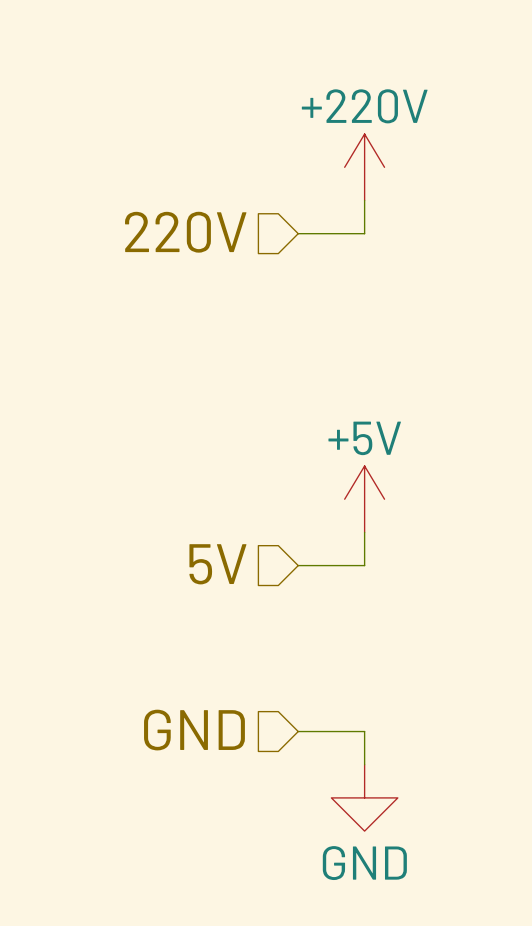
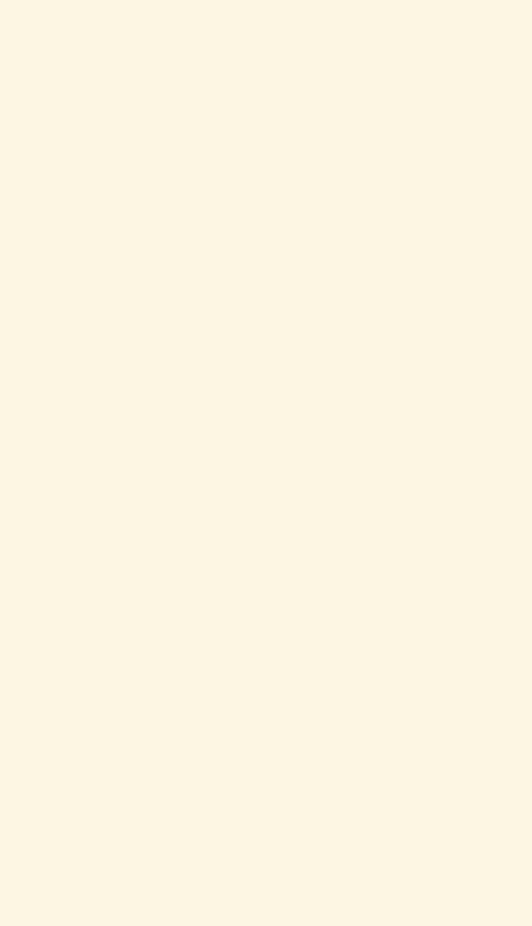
power symbol: +220V (364, 167) -> none
wire: (364, 200) (364, 233) (298, 233) -> none
hierarchical label: 220V (185, 232) -> none
power symbol: +5V (364, 499) -> none
wire: (364, 532) (364, 565) (298, 565) -> none
hierarchical label: 5V (218, 564) -> none
hierarchical label: GND (194, 730) -> none
wire: (298, 731) (364, 731) (364, 764) -> none
power symbol: GND (364, 797) -> none

